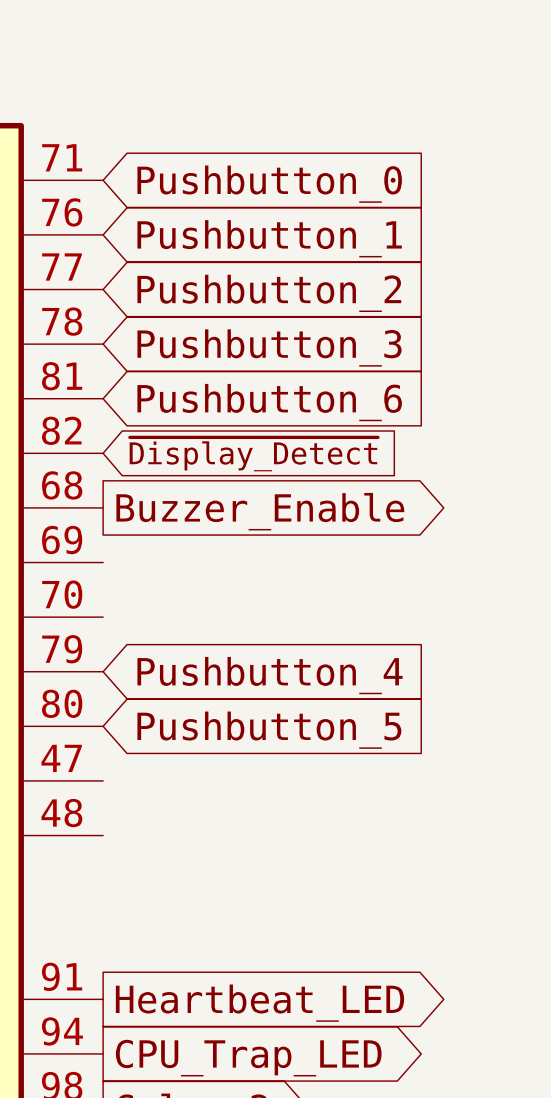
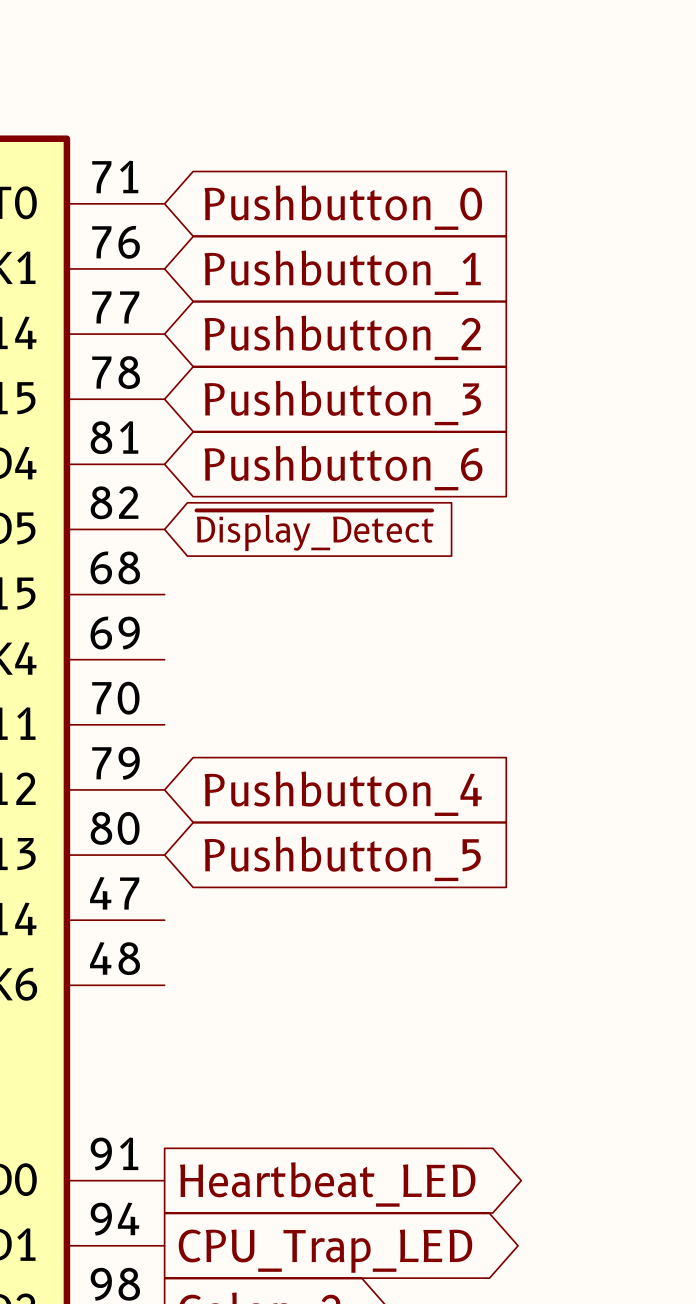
global label: Buzzer_Enable (260, 511) -> none

